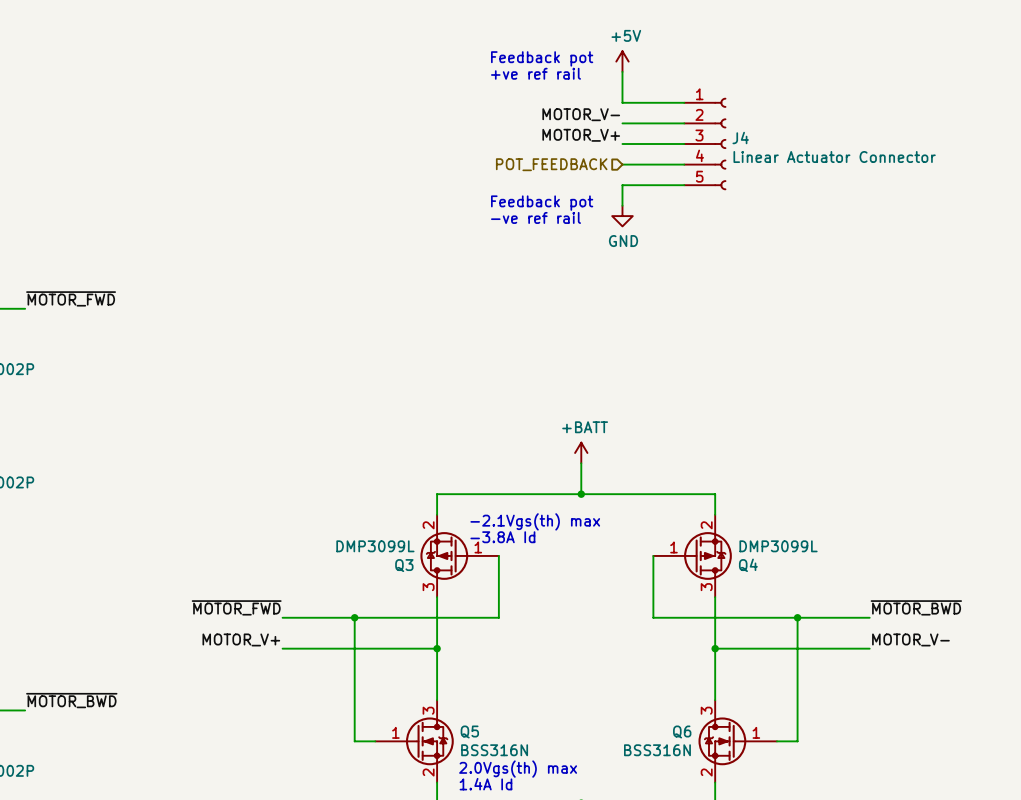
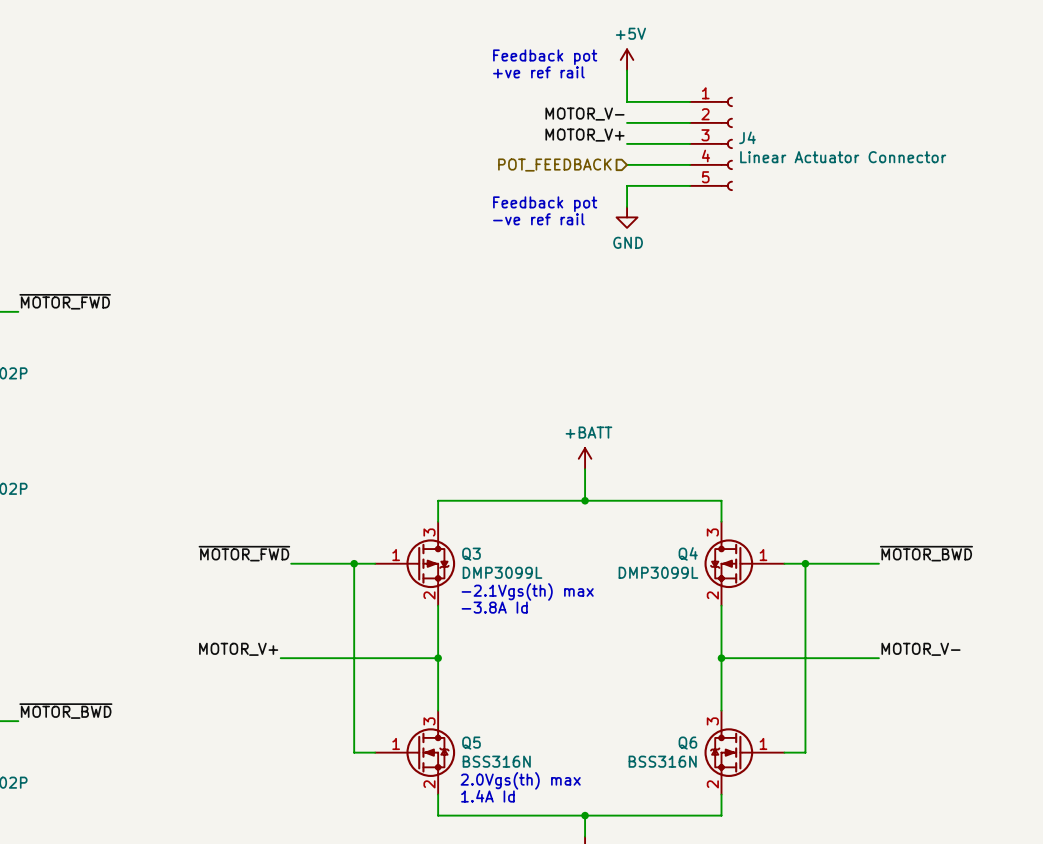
text position: -2.1Vgs(th) max (535, 521) -> -2.1Vgs(th) max (527, 591)
text position: -3.8A Id (502, 537) -> -3.8A Id (494, 607)
wire: none -> (291, 563) (375, 563)
wire: none -> (354, 563) (354, 626)
junction: none -> (354, 563)
Q3 rotation: 0° (444, 555) -> 180° (430, 563)
wire: (498, 555) (498, 617) (282, 617) -> none
wire: (653, 555) (653, 617) (869, 617) -> none
Q4 rotation: 0° (707, 555) -> 180° (728, 563)
wire: none -> (784, 563) (878, 563)
wire: none -> (805, 563) (805, 626)
junction: none -> (805, 563)
label position: ~{MOTOR_FWD} (236, 607) -> ~{MOTOR_FWD} (244, 553)
label position: ~{MOTOR_BWD} (916, 607) -> ~{MOTOR_BWD} (926, 553)
junction: (354, 617) -> none
junction: (797, 617) -> none

